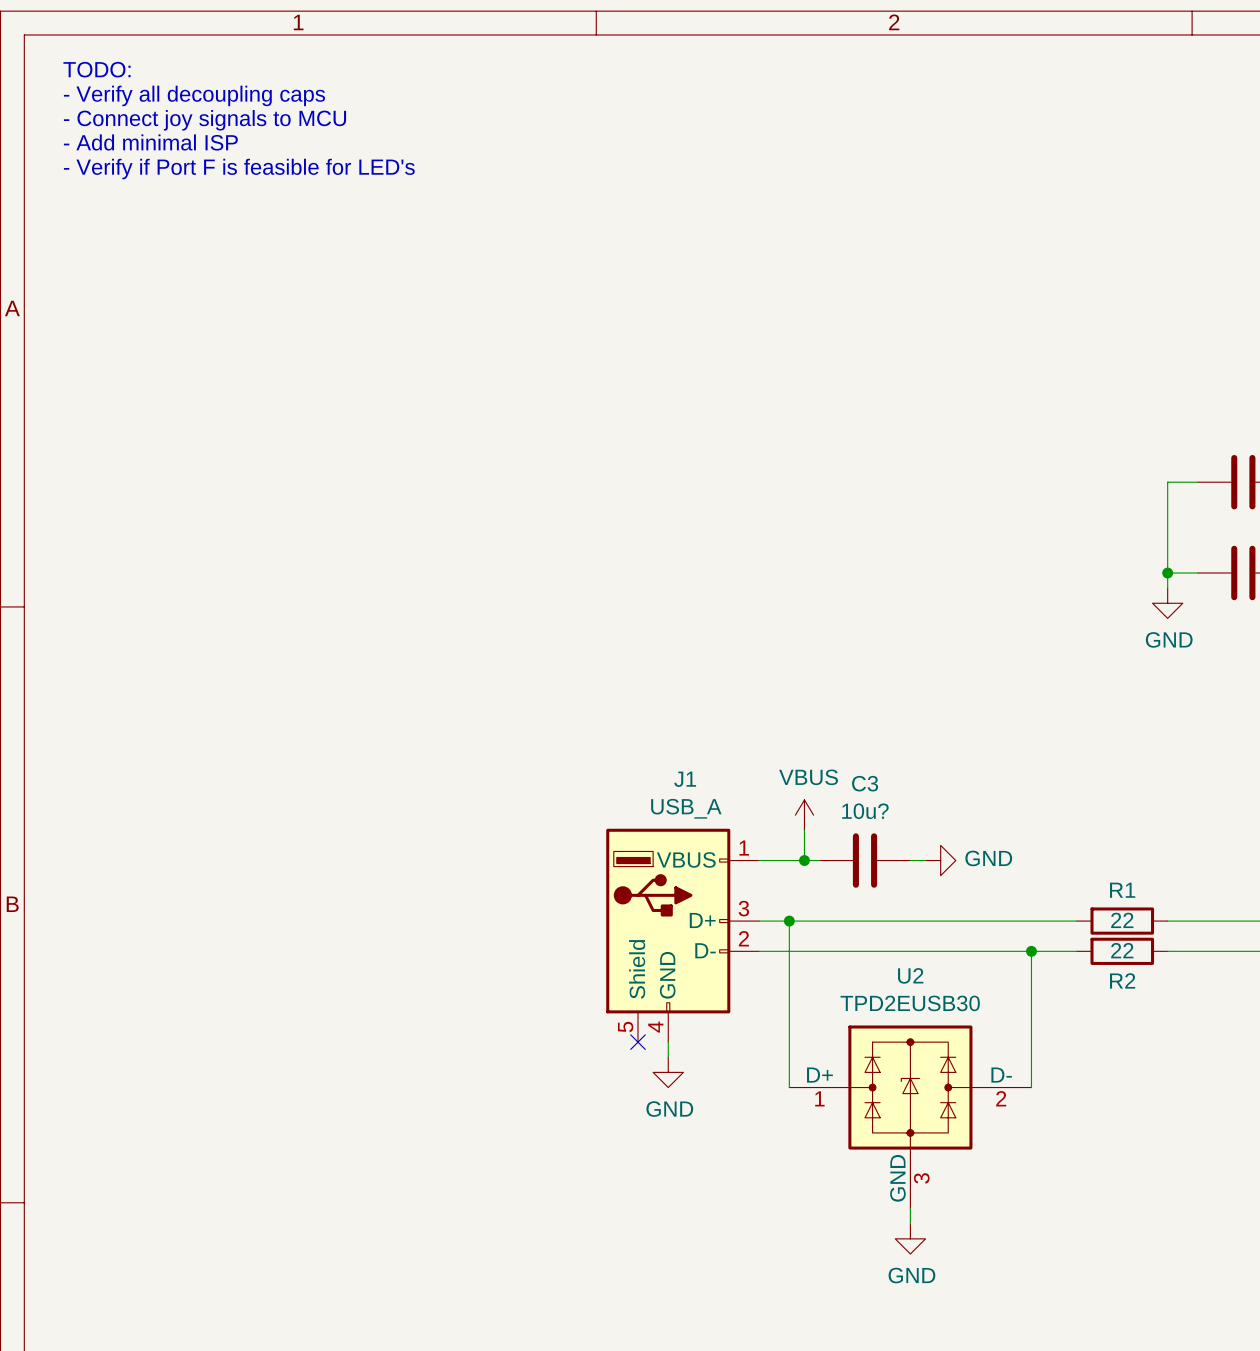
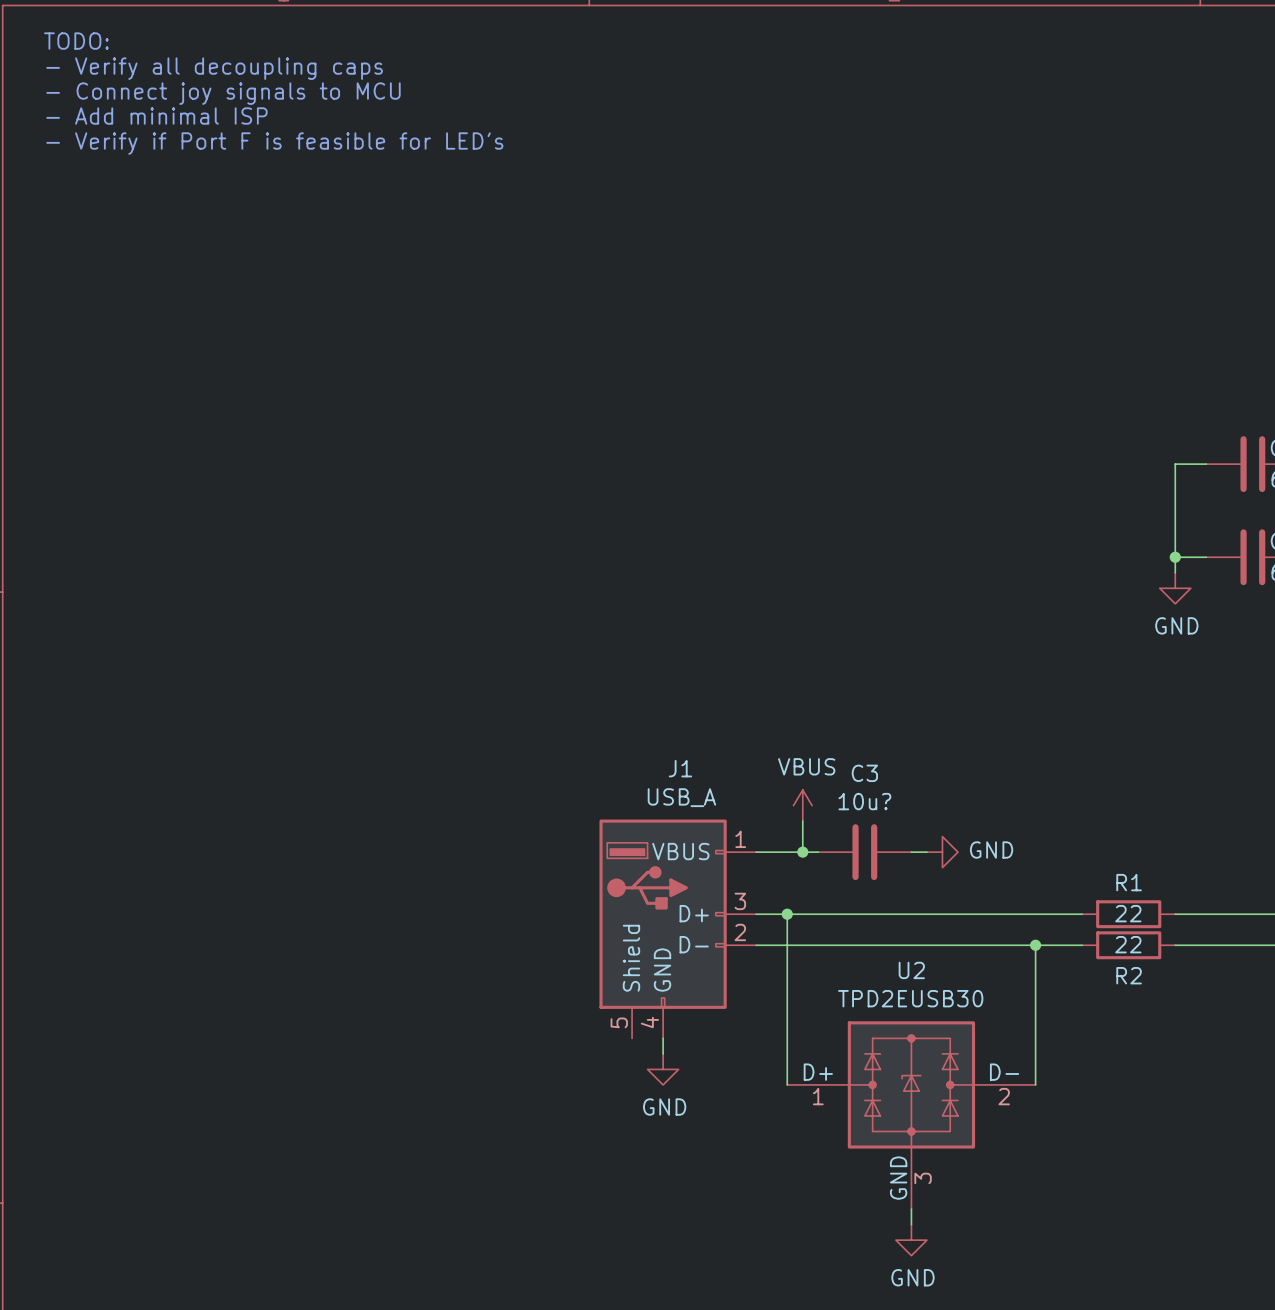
no-connect mark: (638, 1042) -> none

